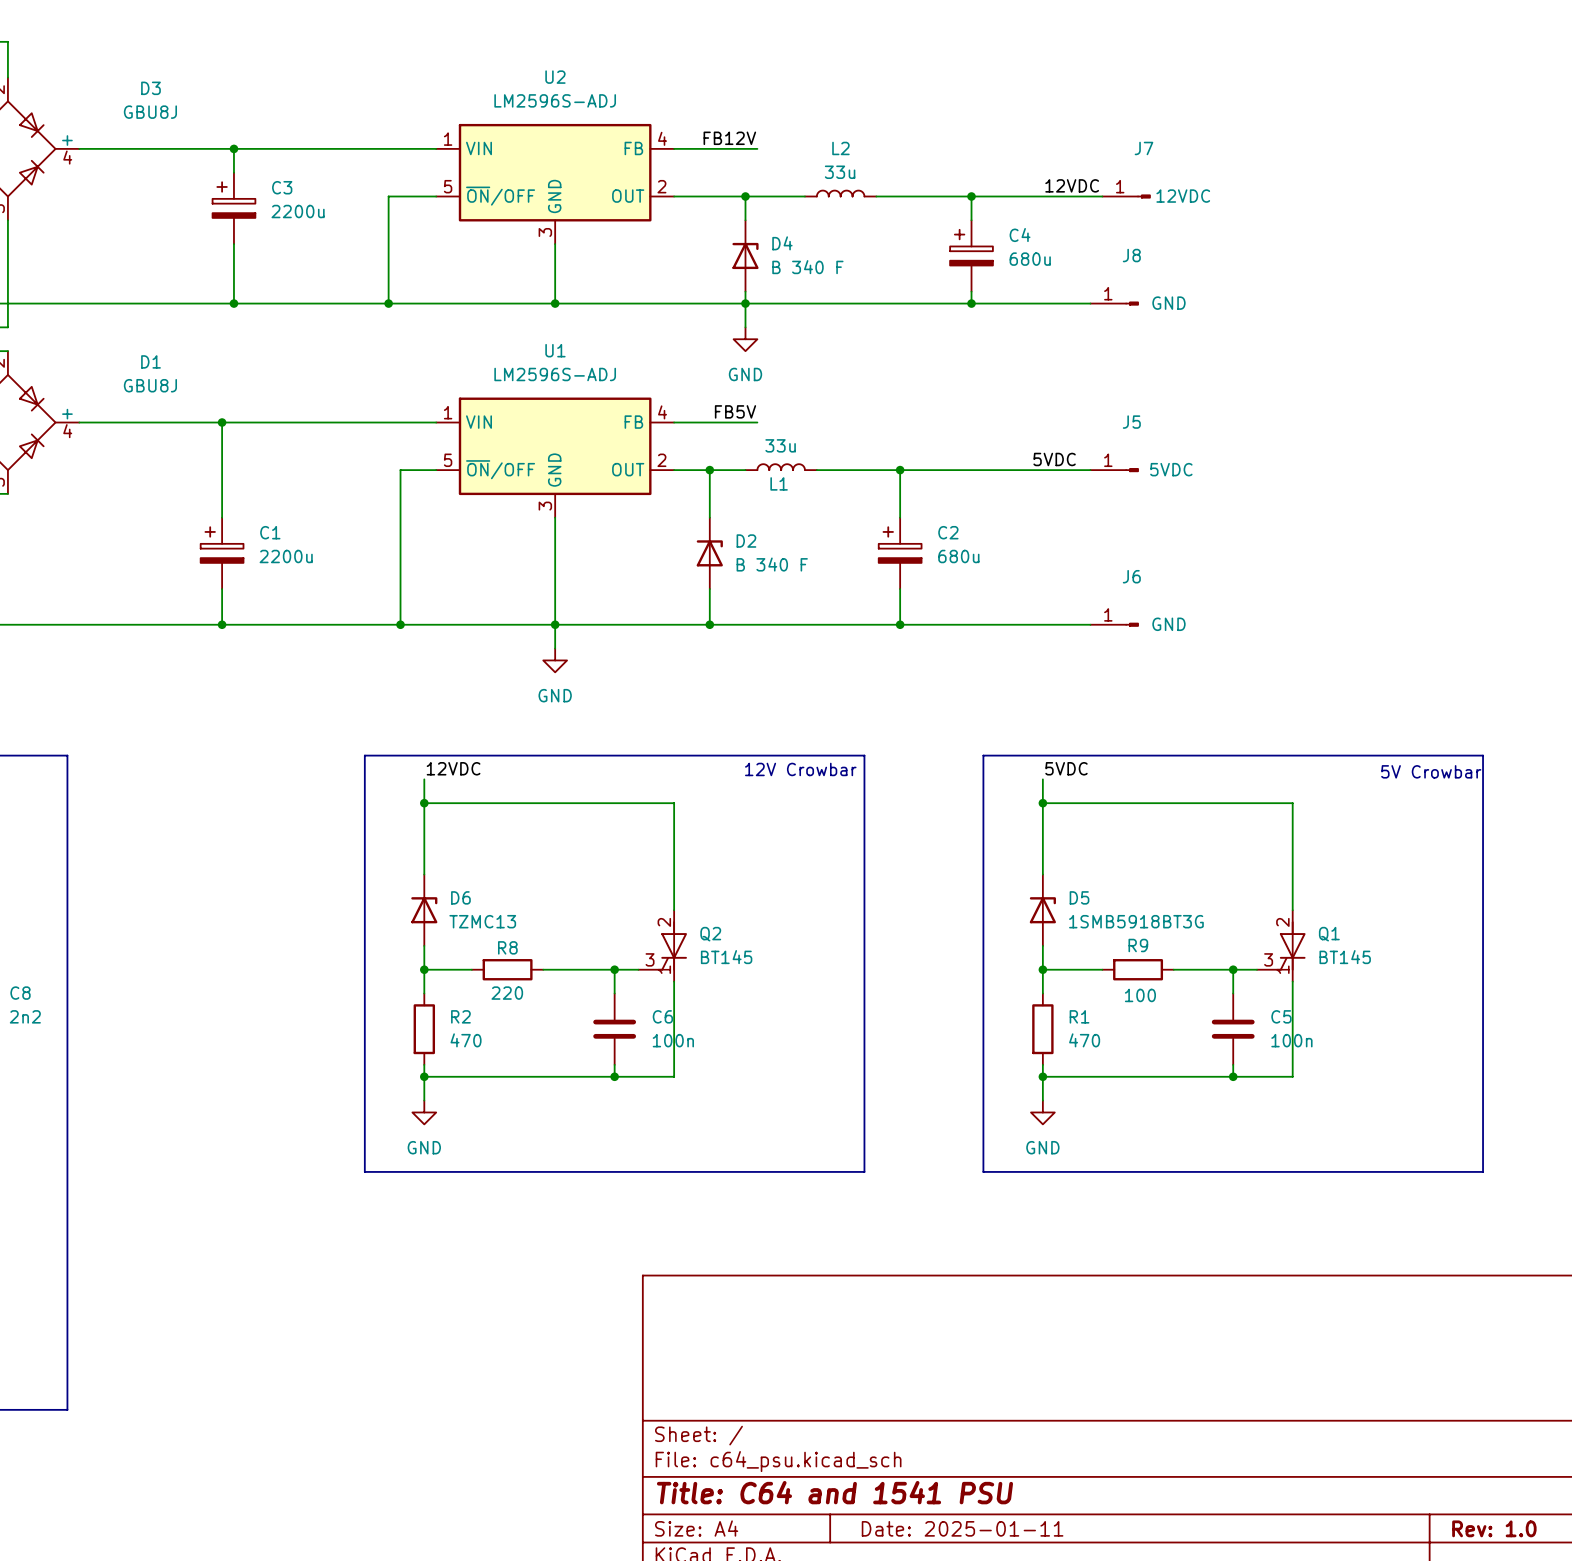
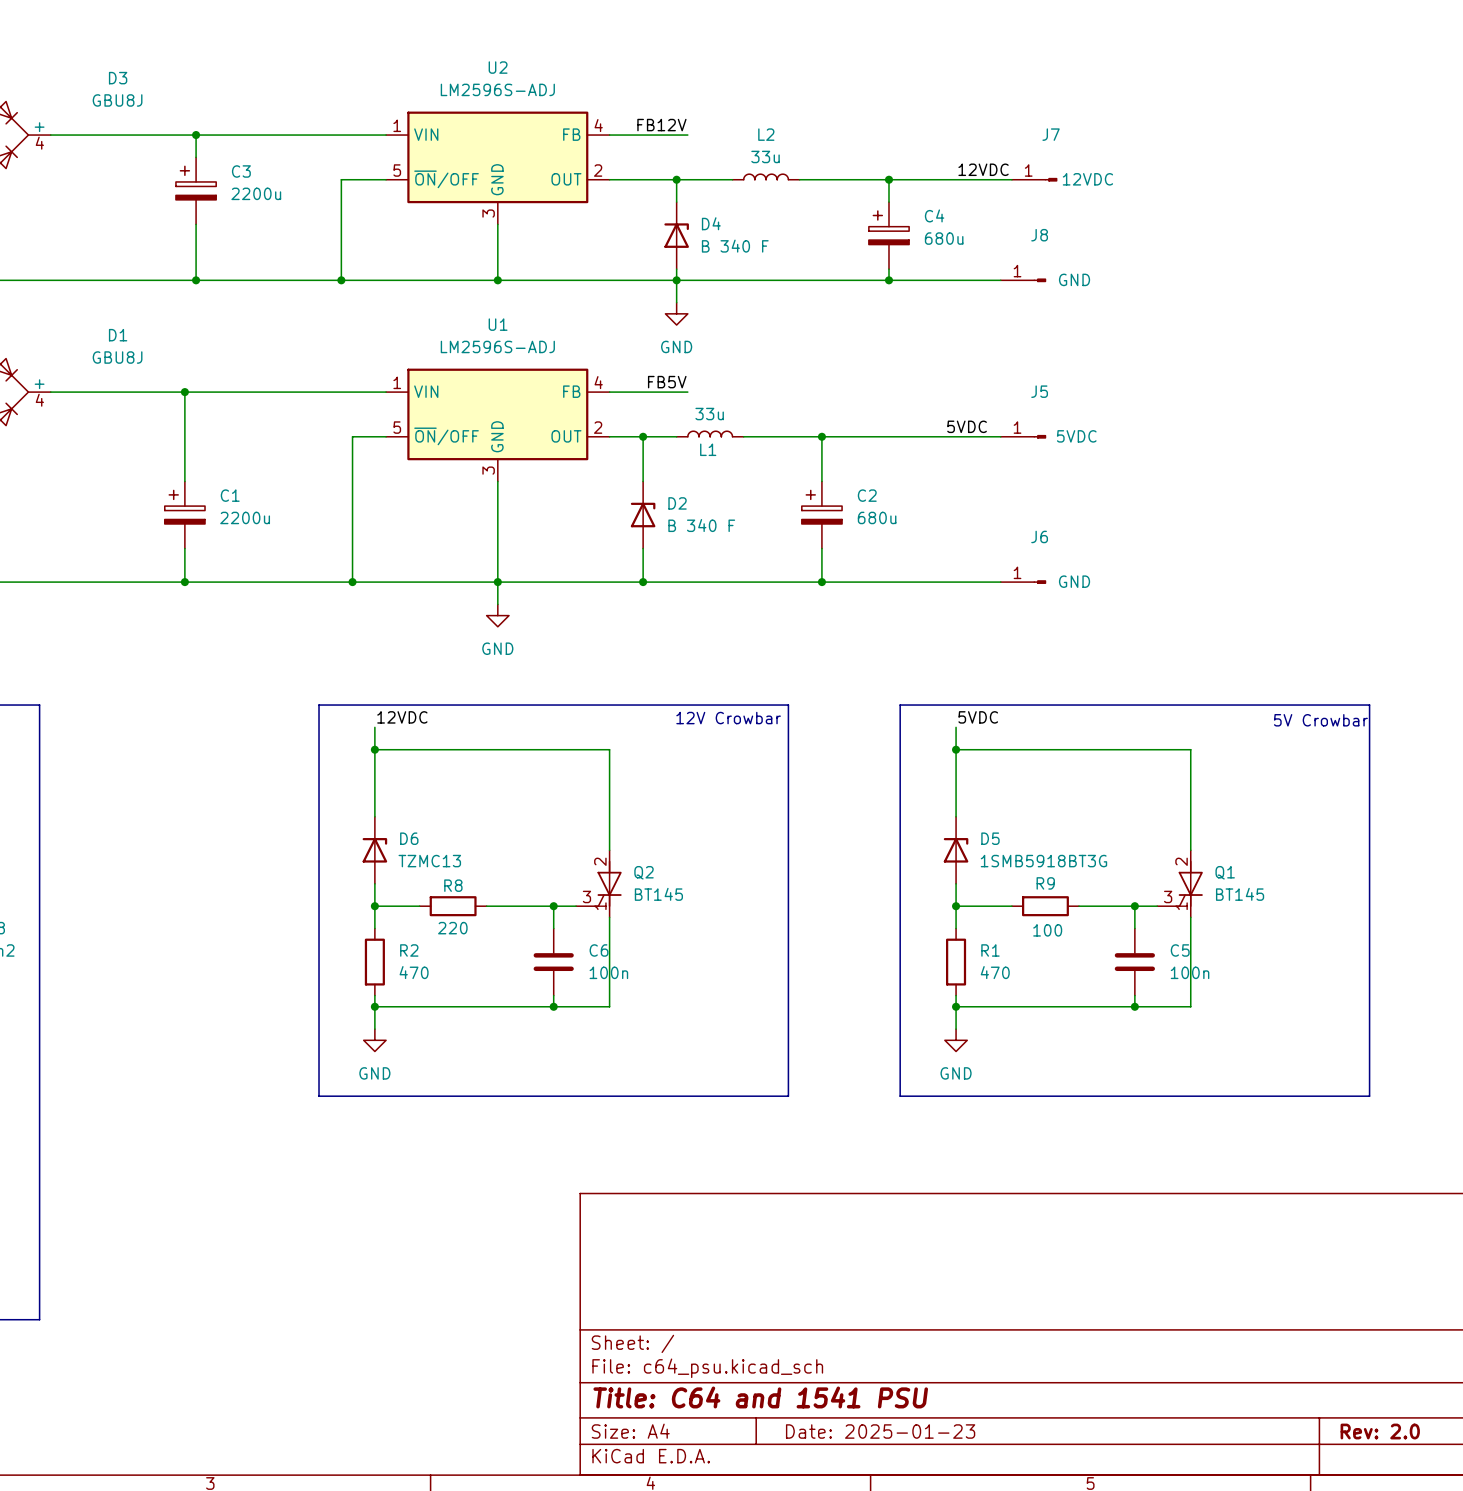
title block: Date: 2025-01-11 (962, 1528) -> Date: 2025-01-23 (880, 1431)
title block: Rev: 1.0 (1494, 1528) -> Rev: 2.0 (1380, 1431)

